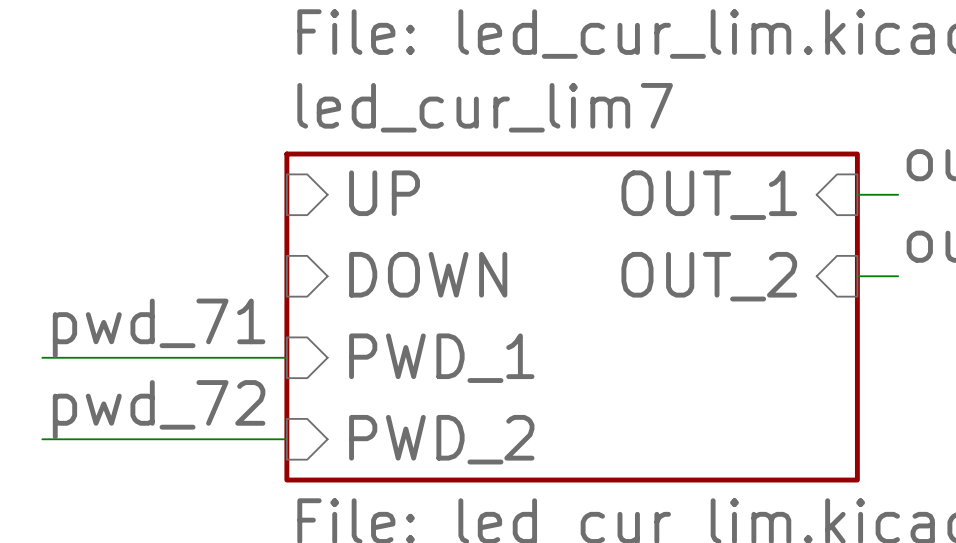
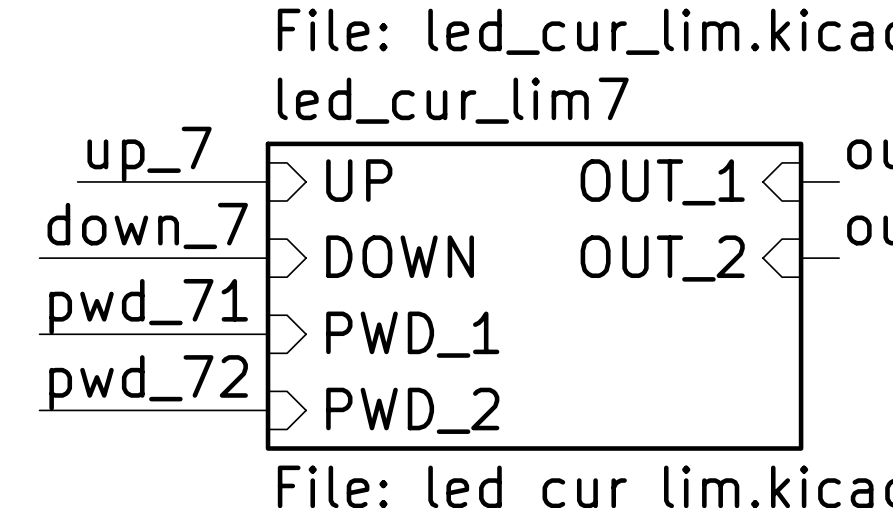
label: none -> up_7 (149, 154)
wire: none -> (77, 181) (268, 181)
label: none -> down_7 (147, 225)
wire: none -> (39, 258) (268, 258)

